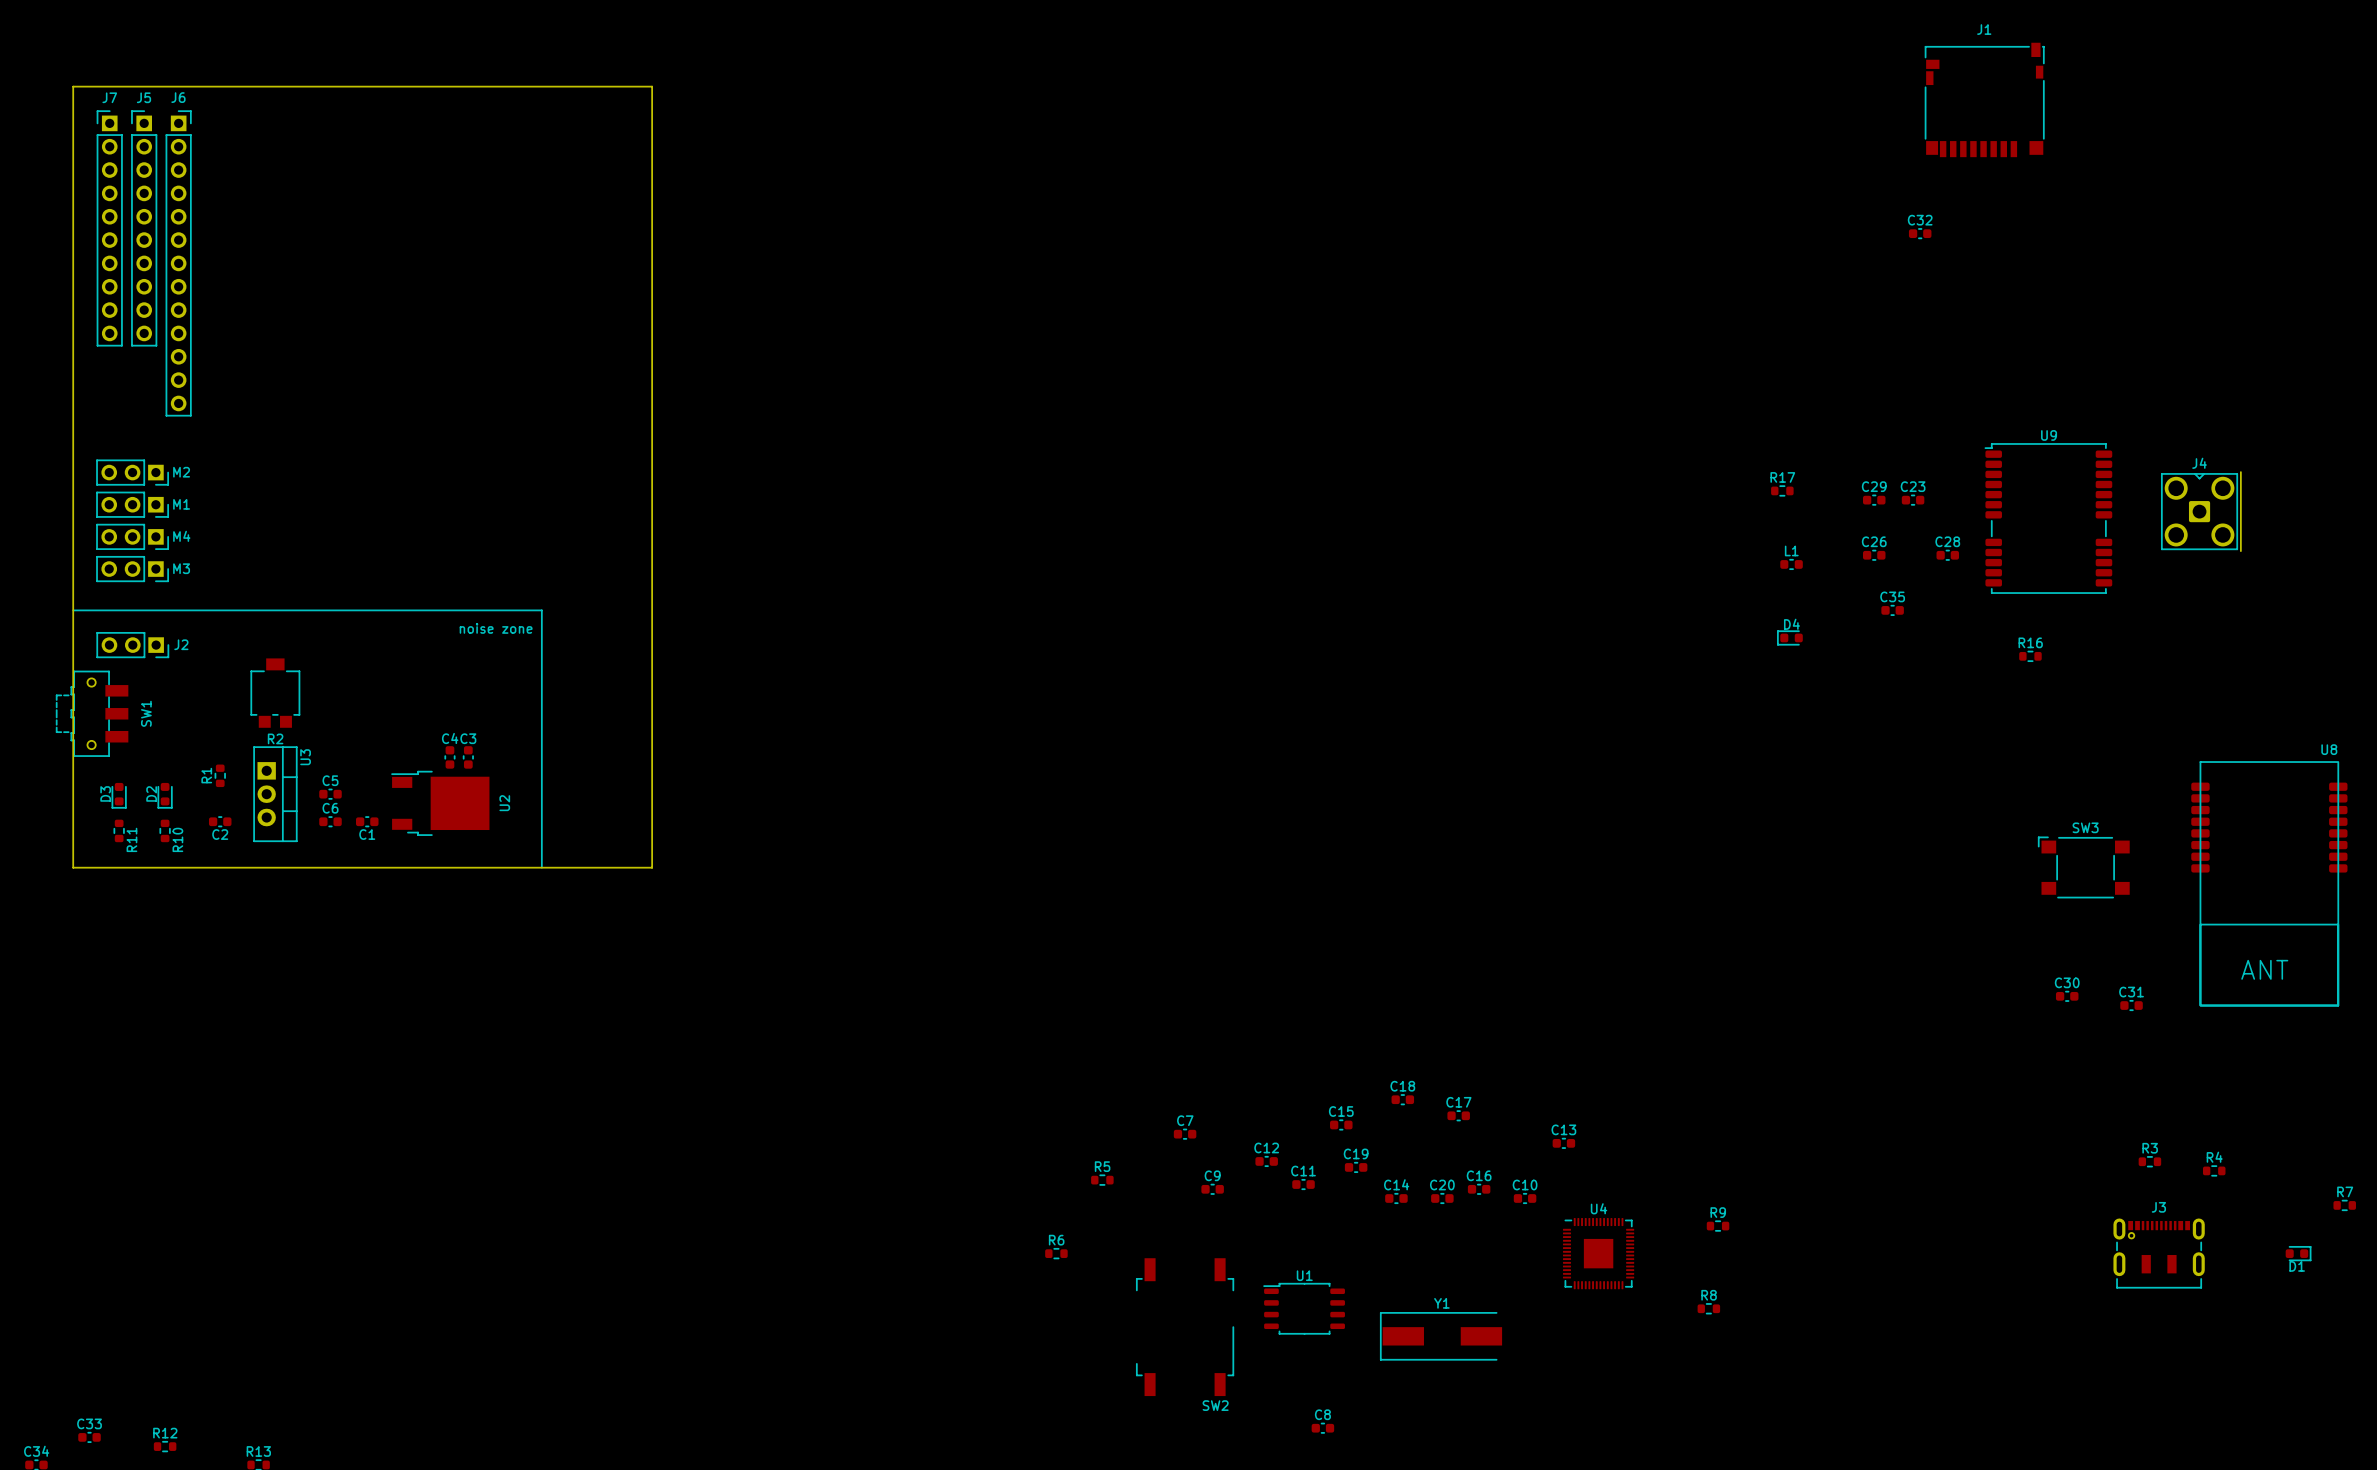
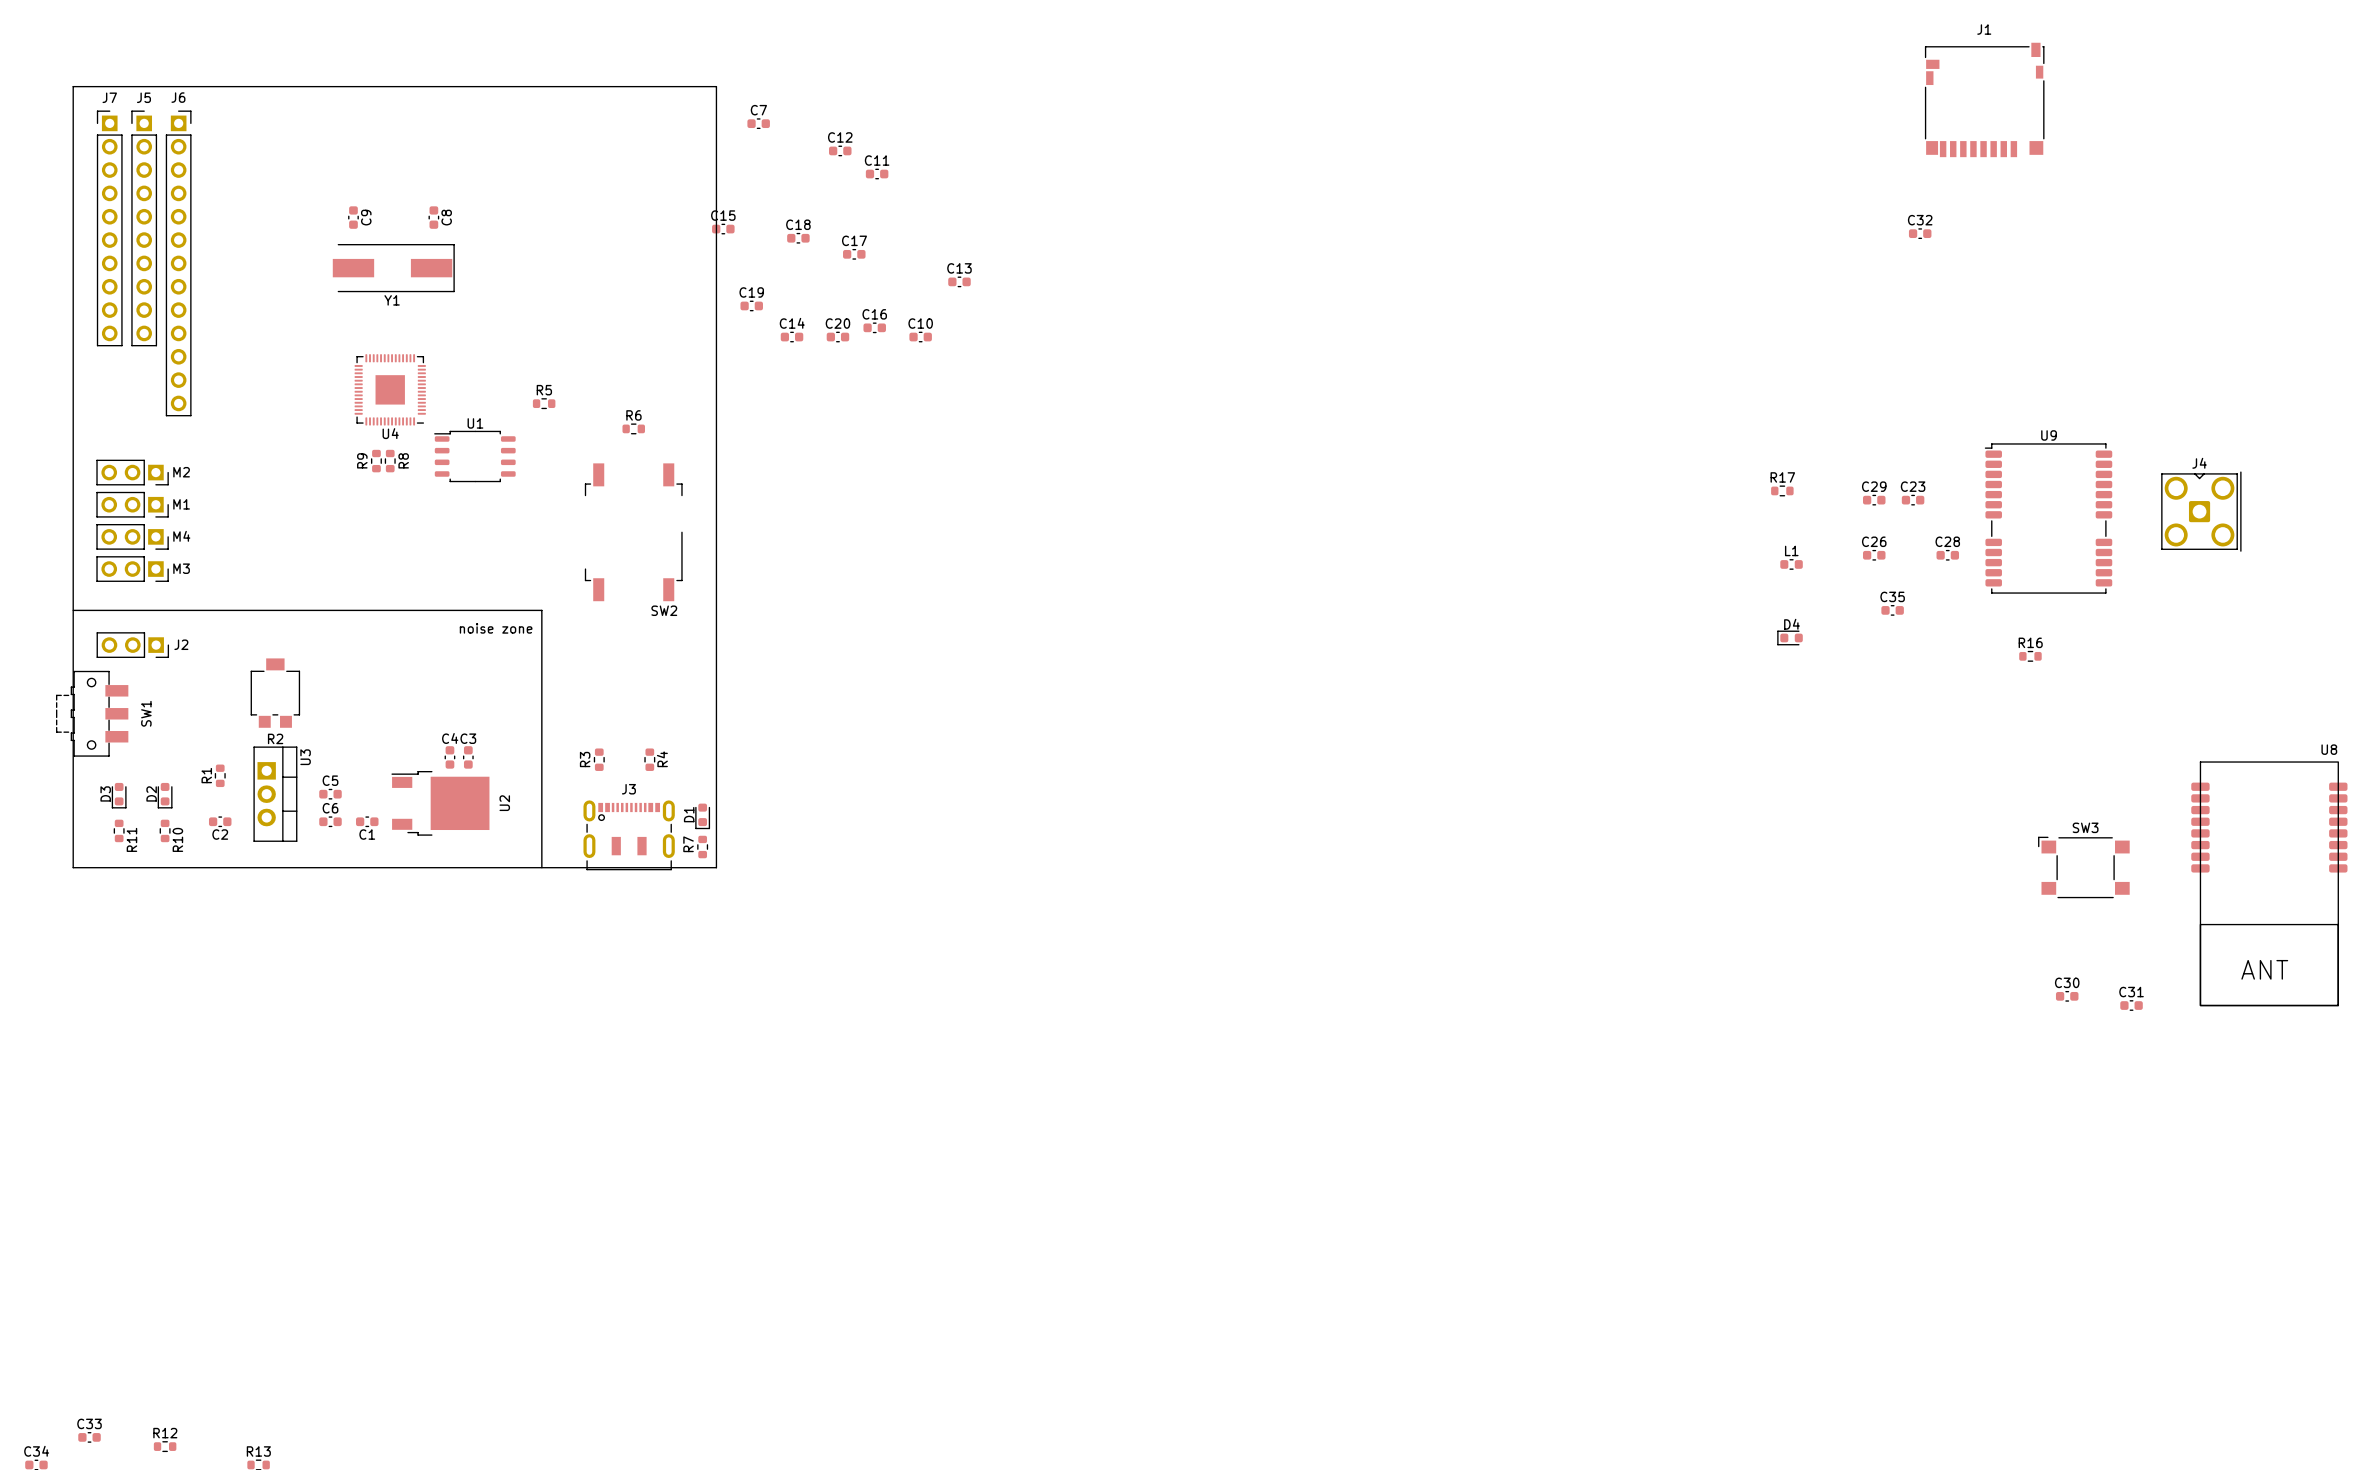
board edge: (652, 86) (652, 867) -> (652, 86) (716, 86) (716, 867) (652, 867)
C18 position: (1402, 1099) -> (798, 238)
C17 position: (1458, 1115) -> (854, 254)
C15 position: (1341, 1124) -> (723, 229)
C7 position: (1185, 1134) -> (758, 123)
C13 position: (1563, 1143) -> (959, 281)
R3 name position: R3 (2150, 1148) -> R3 (585, 759)
C12 position: (1266, 1161) -> (840, 150)
R3 rotation: 0° (2149, 1161) -> 90° clockwise (599, 759)
R3 position: (2149, 1161) -> (599, 759)
C19 position: (1356, 1167) -> (751, 305)
R4 rotation: 0° (2214, 1170) -> 90° clockwise (649, 759)
R4 position: (2214, 1170) -> (649, 759)
R5 position: (1102, 1180) -> (544, 403)
C11 position: (1303, 1184) -> (877, 174)
C9 rotation: 0° (1212, 1189) -> 90° clockwise (353, 217)
C9 position: (1212, 1189) -> (353, 217)
C16 position: (1479, 1189) -> (874, 327)
C14 position: (1396, 1198) -> (792, 337)
C20 position: (1442, 1198) -> (837, 337)
C10 position: (1525, 1198) -> (920, 337)
R7 rotation: 0° (2344, 1205) -> 90° clockwise (702, 847)
R7 position: (2344, 1205) -> (702, 847)
R9 name position: R9 (1718, 1212) -> R9 (362, 460)
R9 rotation: 0° (1718, 1226) -> 90° clockwise (376, 461)
R9 position: (1718, 1226) -> (376, 461)
R6 position: (1056, 1253) -> (633, 428)
U4 rotation: 0° (1598, 1253) -> 180° (390, 389)
U4 position: (1598, 1253) -> (390, 389)
J3 position: (2159, 1253) -> (629, 835)
D1 rotation: 0° (2298, 1253) -> 90° clockwise (702, 816)
D1 position: (2298, 1253) -> (702, 816)
U1 position: (1304, 1308) -> (474, 456)
R8 rotation: 0° (1708, 1308) -> 90° clockwise (390, 461)
R8 position: (1708, 1308) -> (390, 461)
SW2 position: (1185, 1327) -> (633, 532)
Y1 rotation: 0° (1441, 1336) -> 180° (393, 268)
Y1 position: (1441, 1336) -> (393, 268)
C8 rotation: 0° (1322, 1428) -> 90° clockwise (433, 217)
C8 position: (1322, 1428) -> (433, 217)

